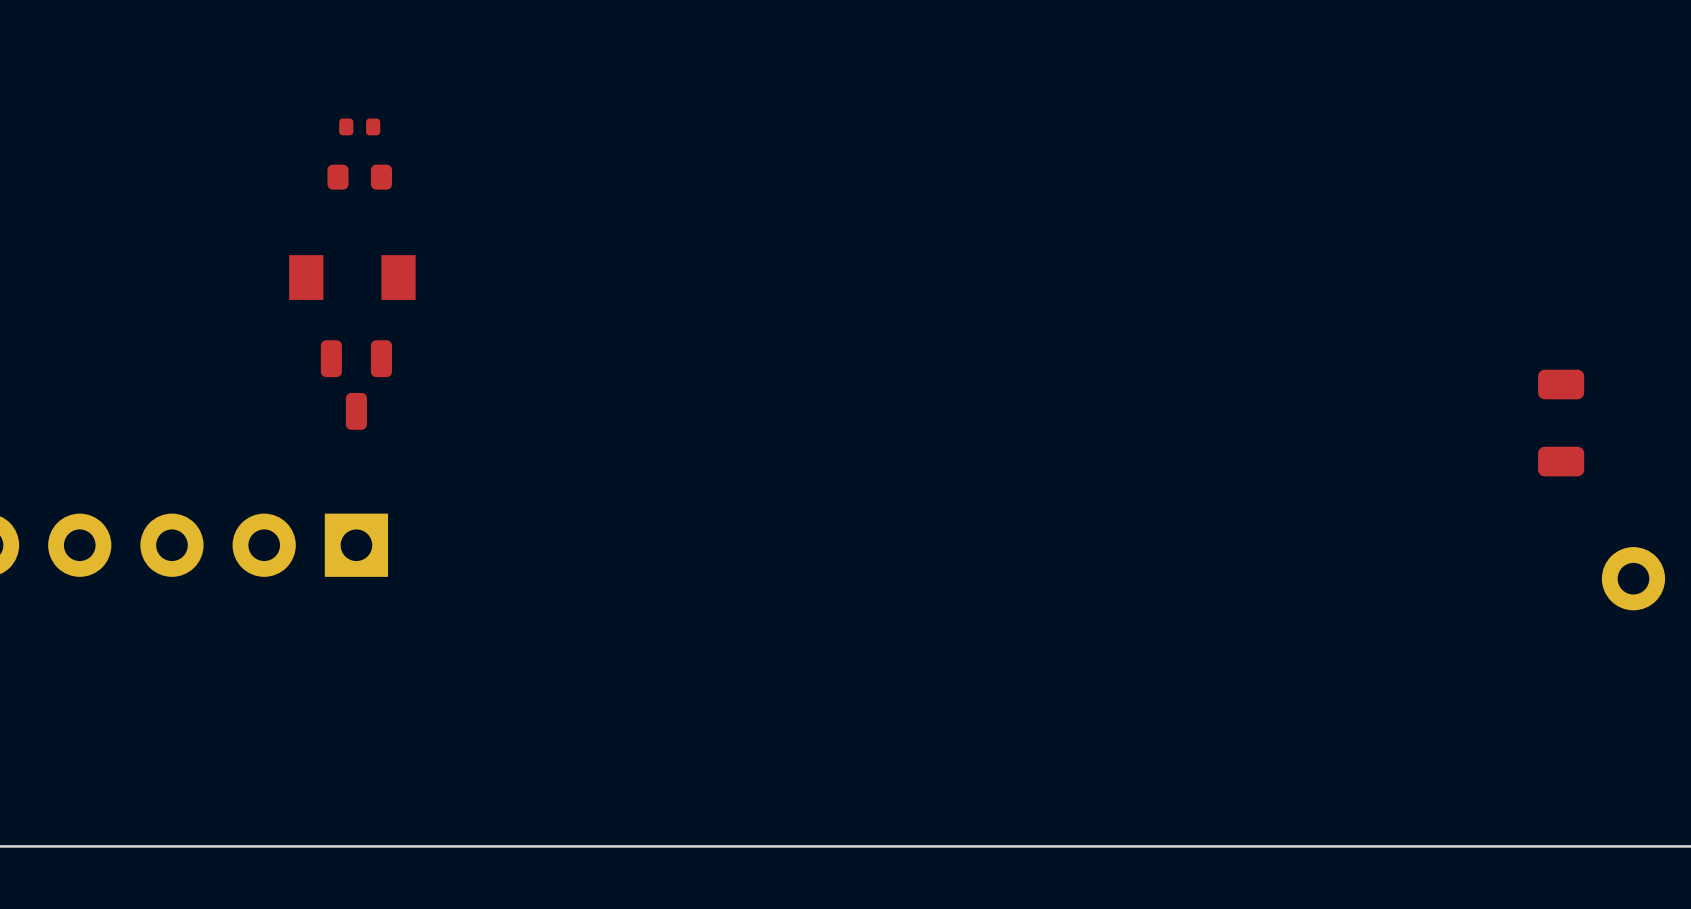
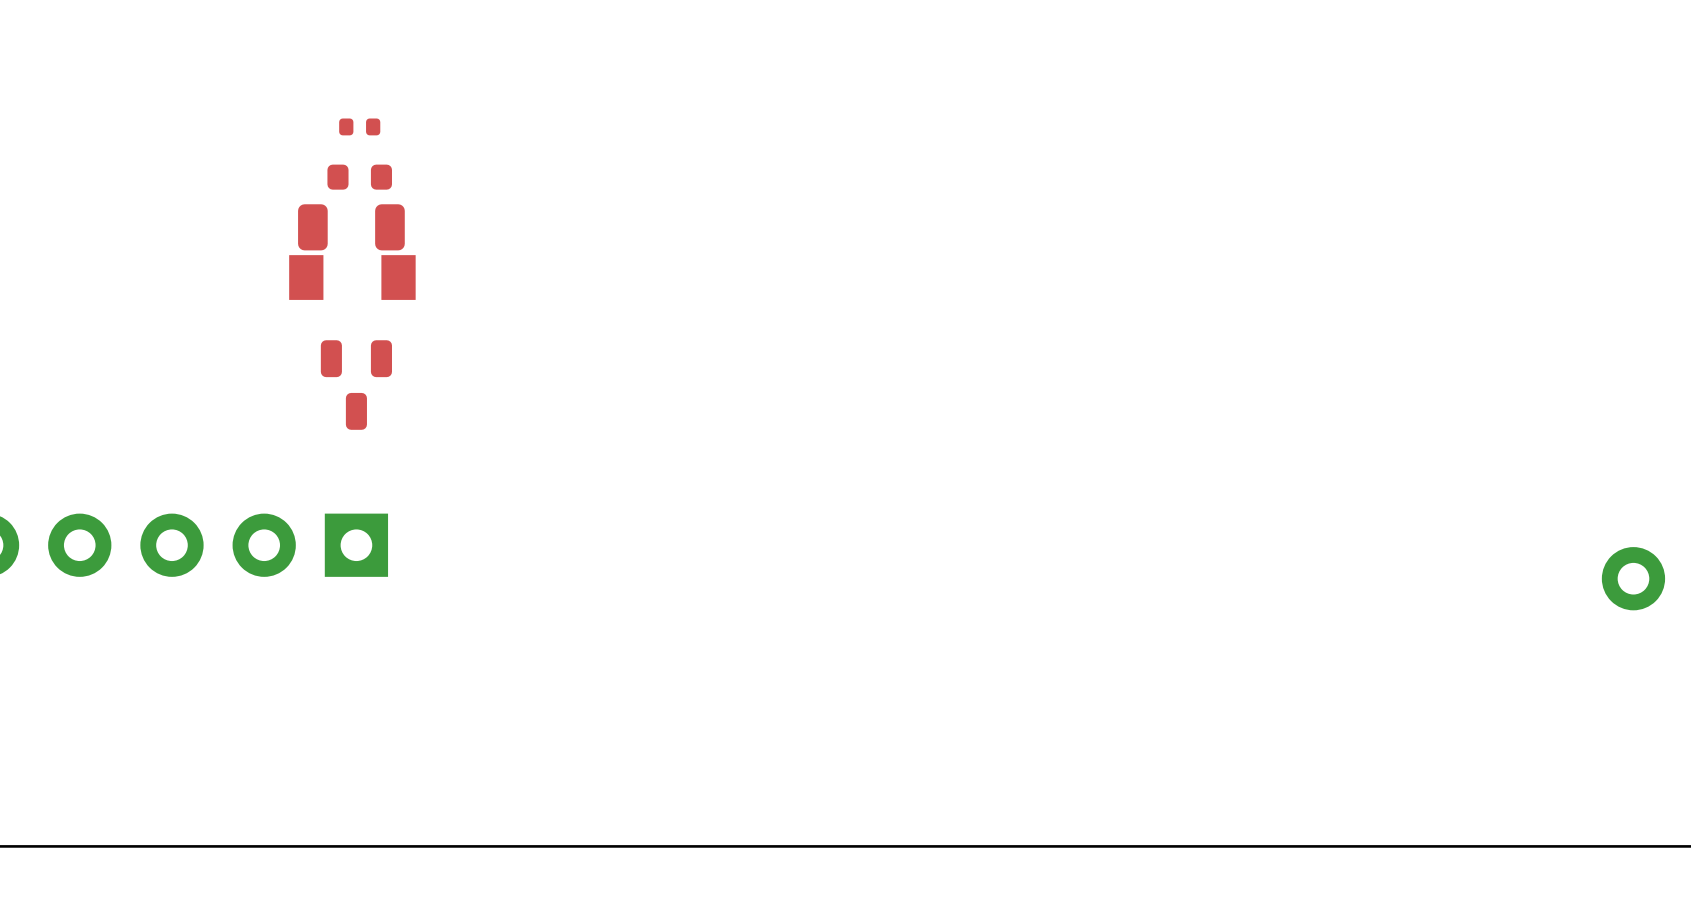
part: none -> (351, 227)
part: (1561, 423) -> none

